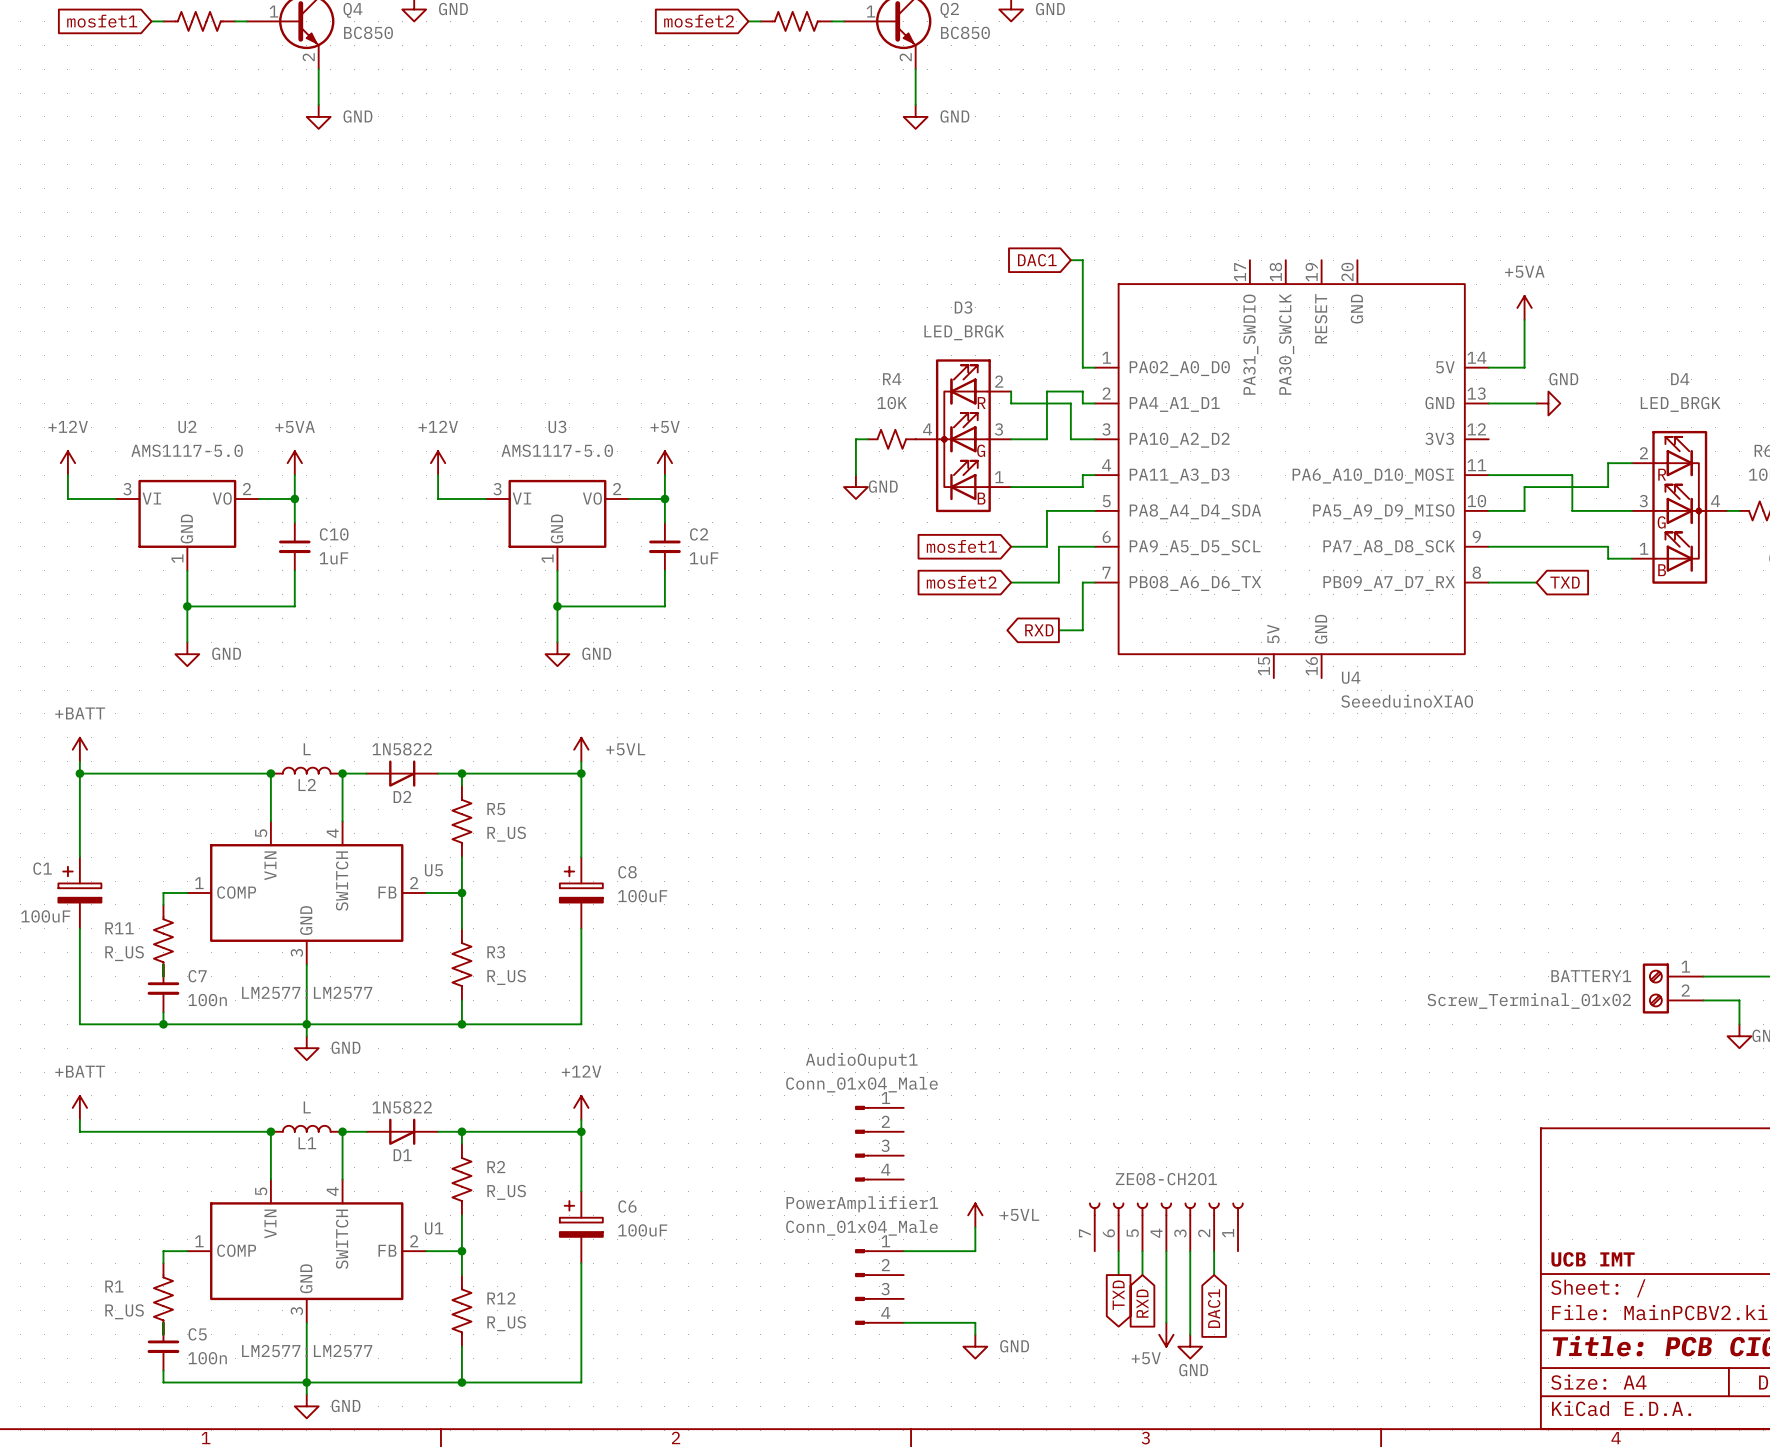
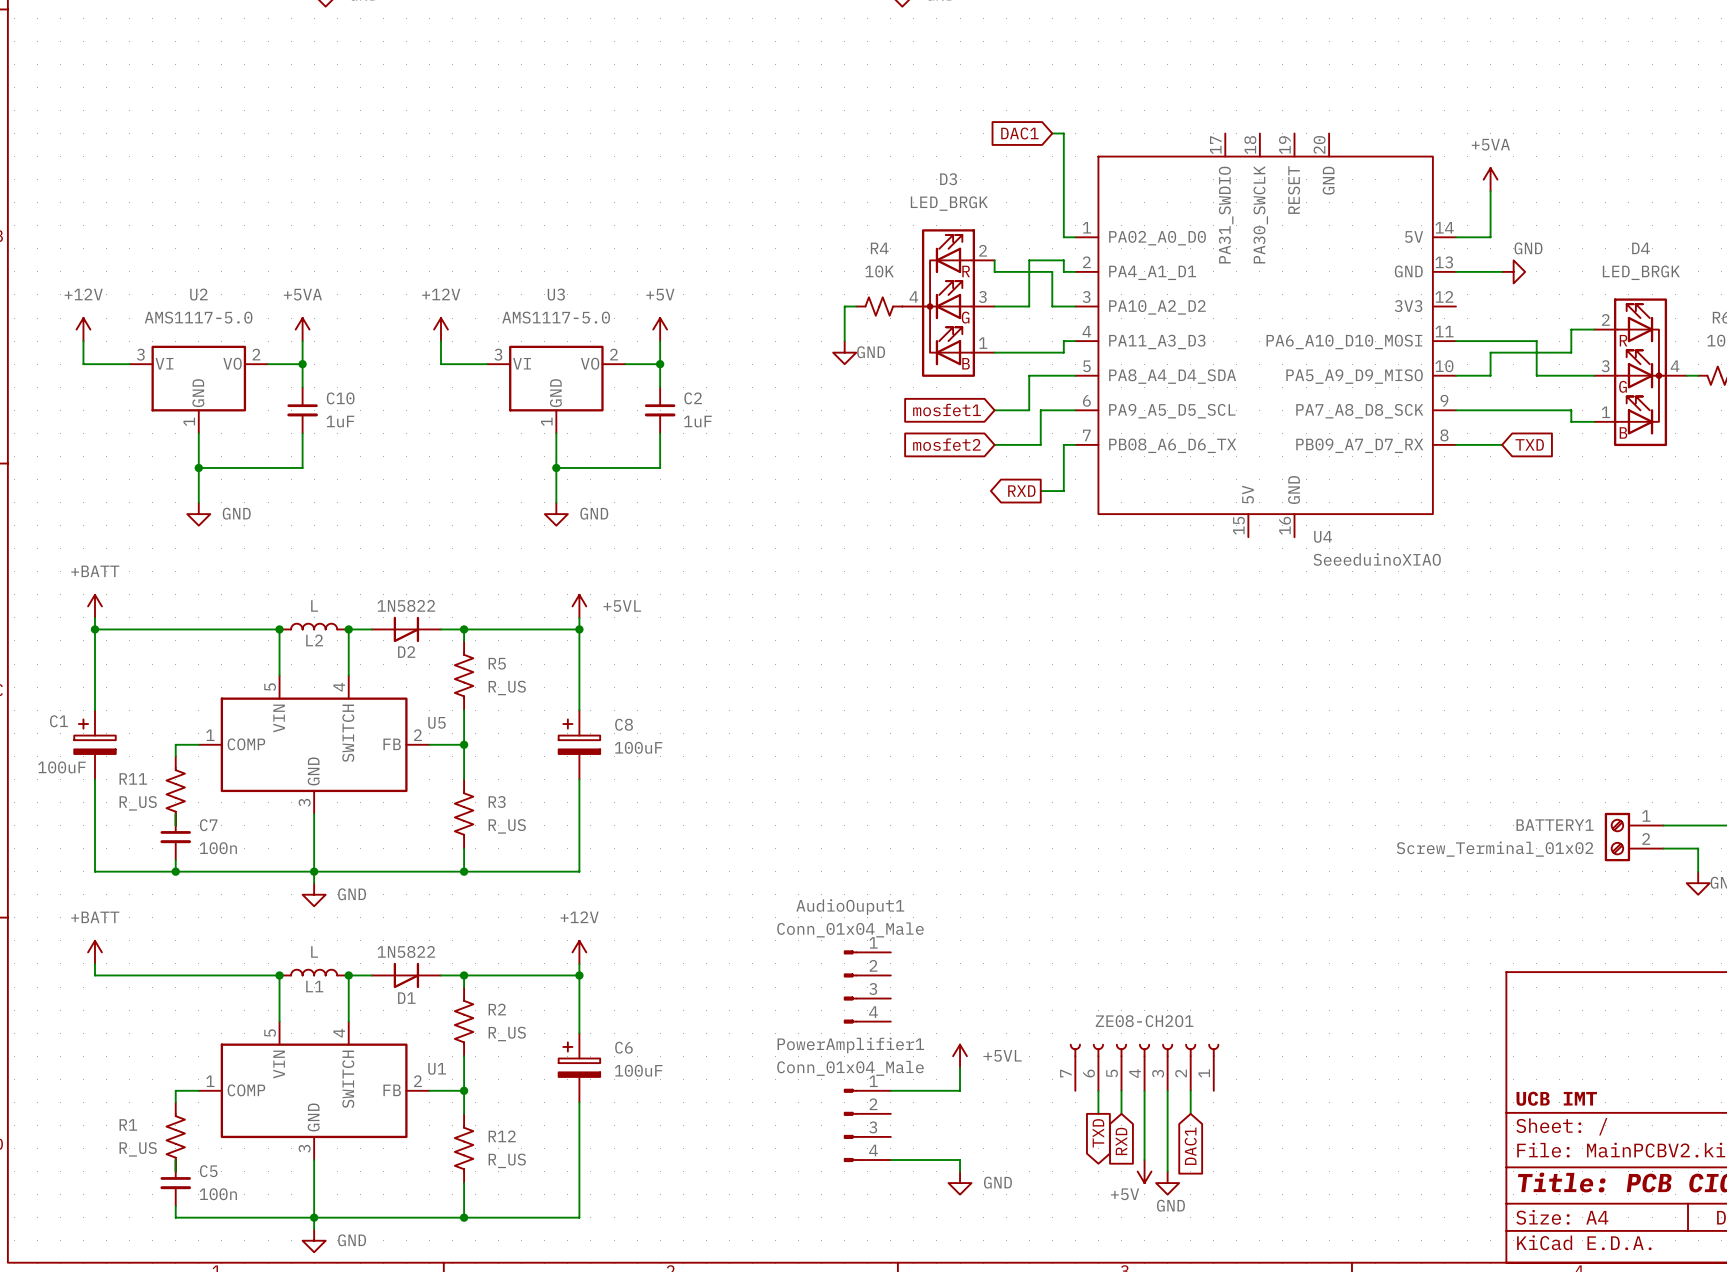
U5 text: LM2577:LM2577 (307, 992) -> none
U1 text: LM2577:LM2577 (307, 1351) -> none

